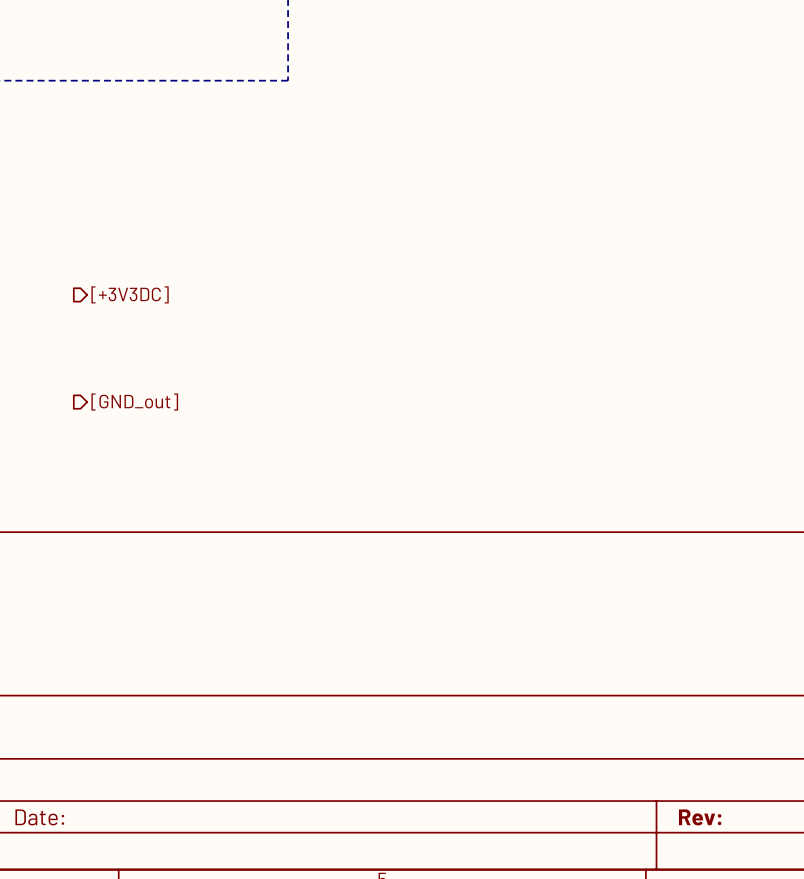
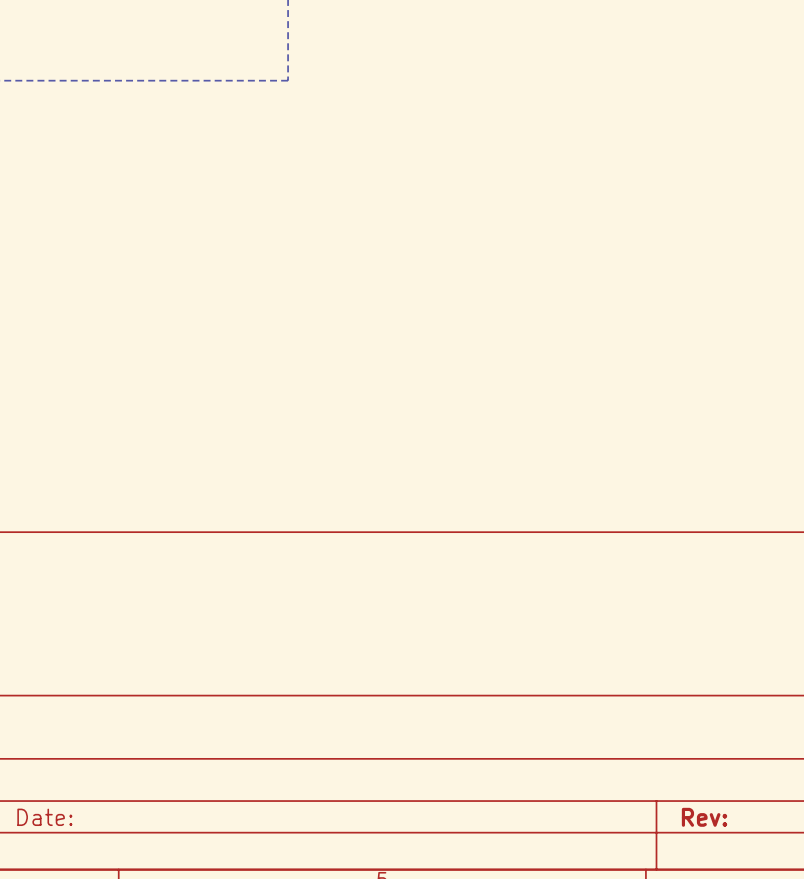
hierarchical label: [+3V3DC] (130, 294) -> none
hierarchical label: [GND_out] (134, 402) -> none

